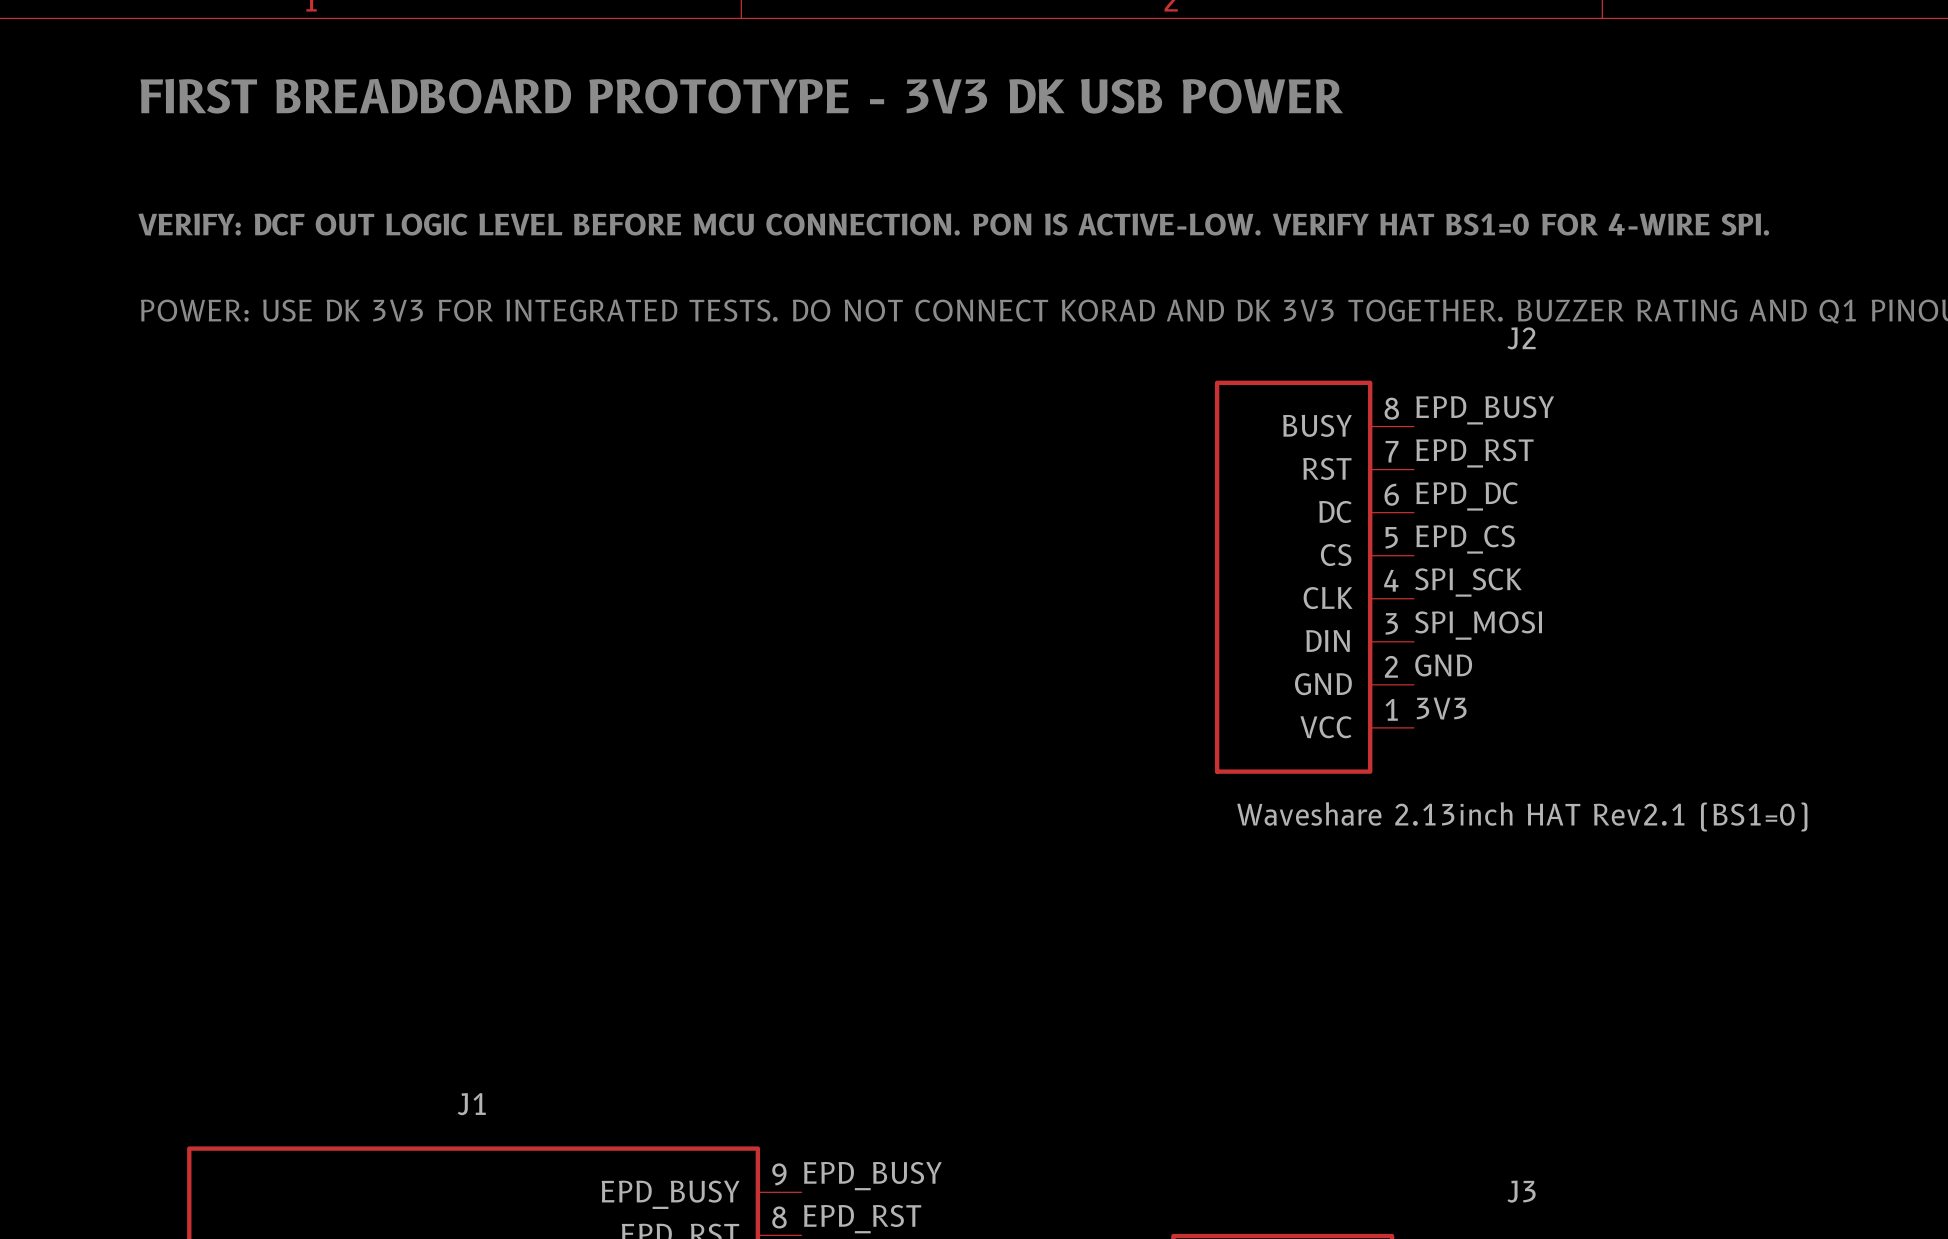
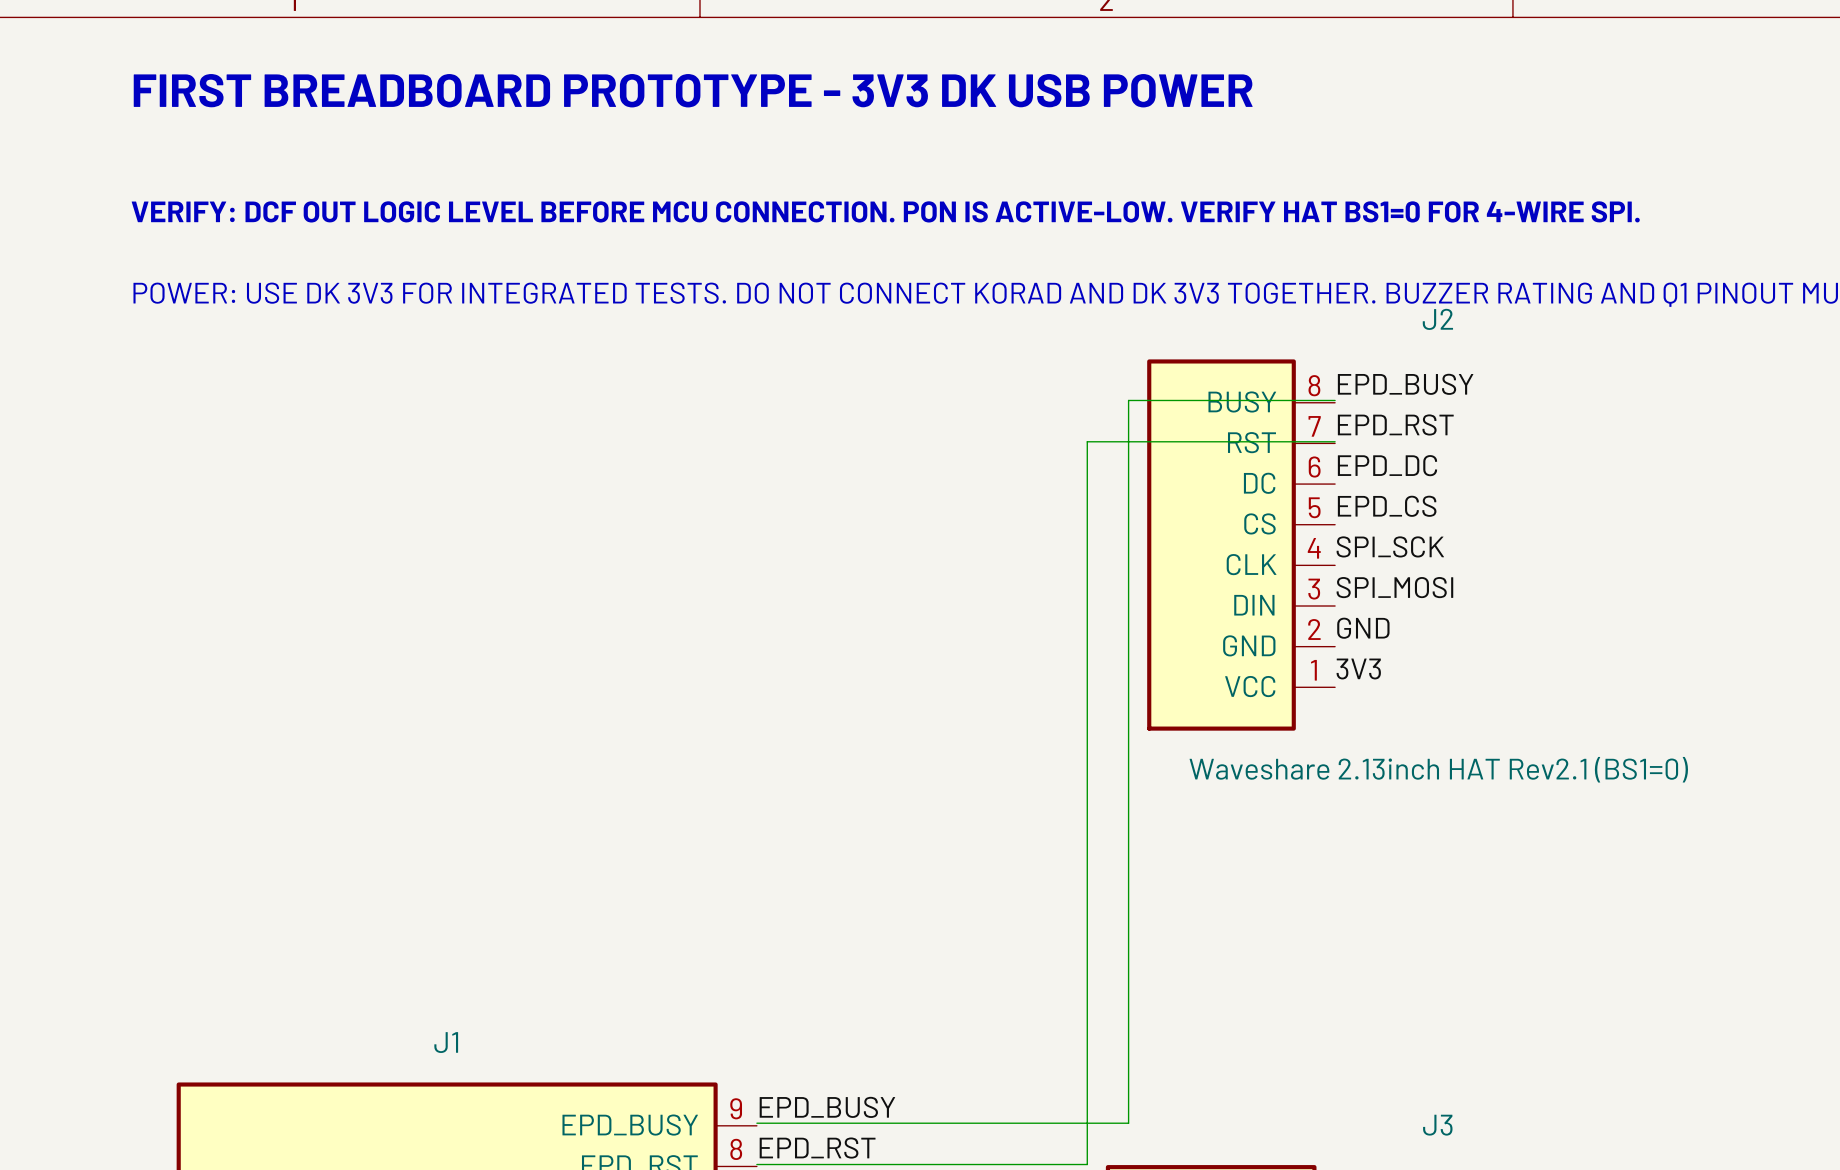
wire: none -> (1335, 400) (1128, 400) (1128, 1123) (756, 1123)
wire: none -> (1335, 441) (1087, 441) (1087, 1164) (756, 1164)

